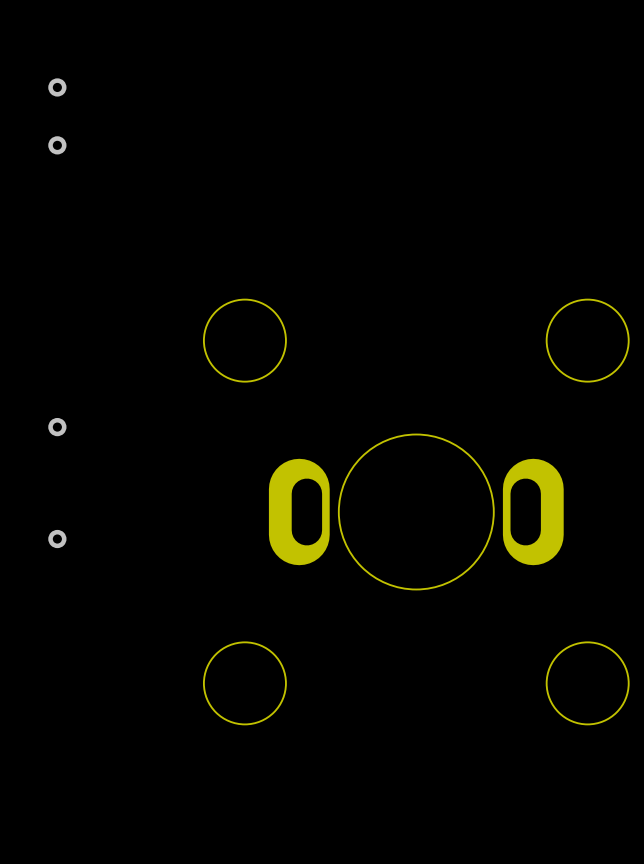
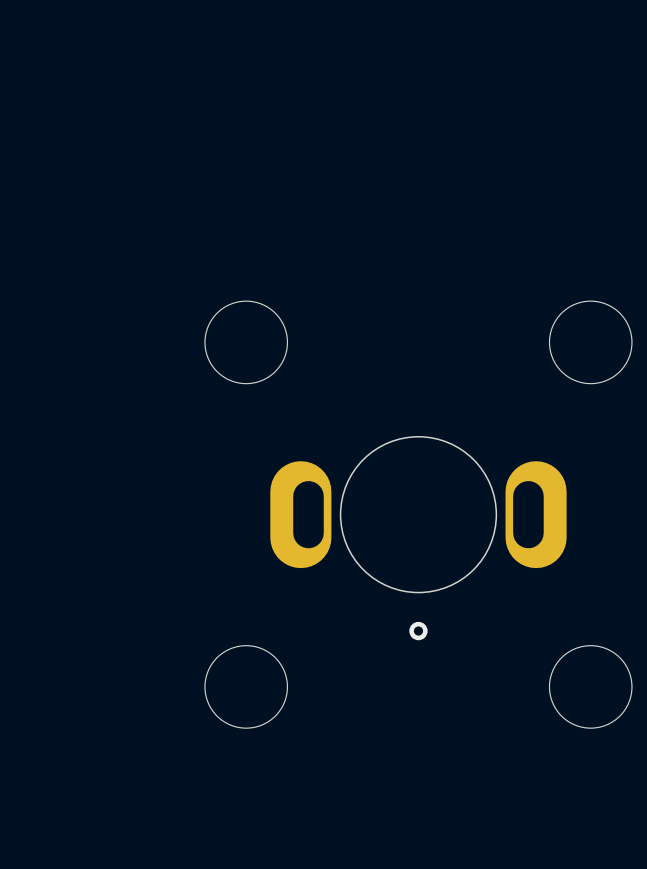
via: (57, 87) -> none
via: (57, 145) -> none
via: (57, 427) -> none
via: (57, 539) -> none
via: none -> (418, 631)

